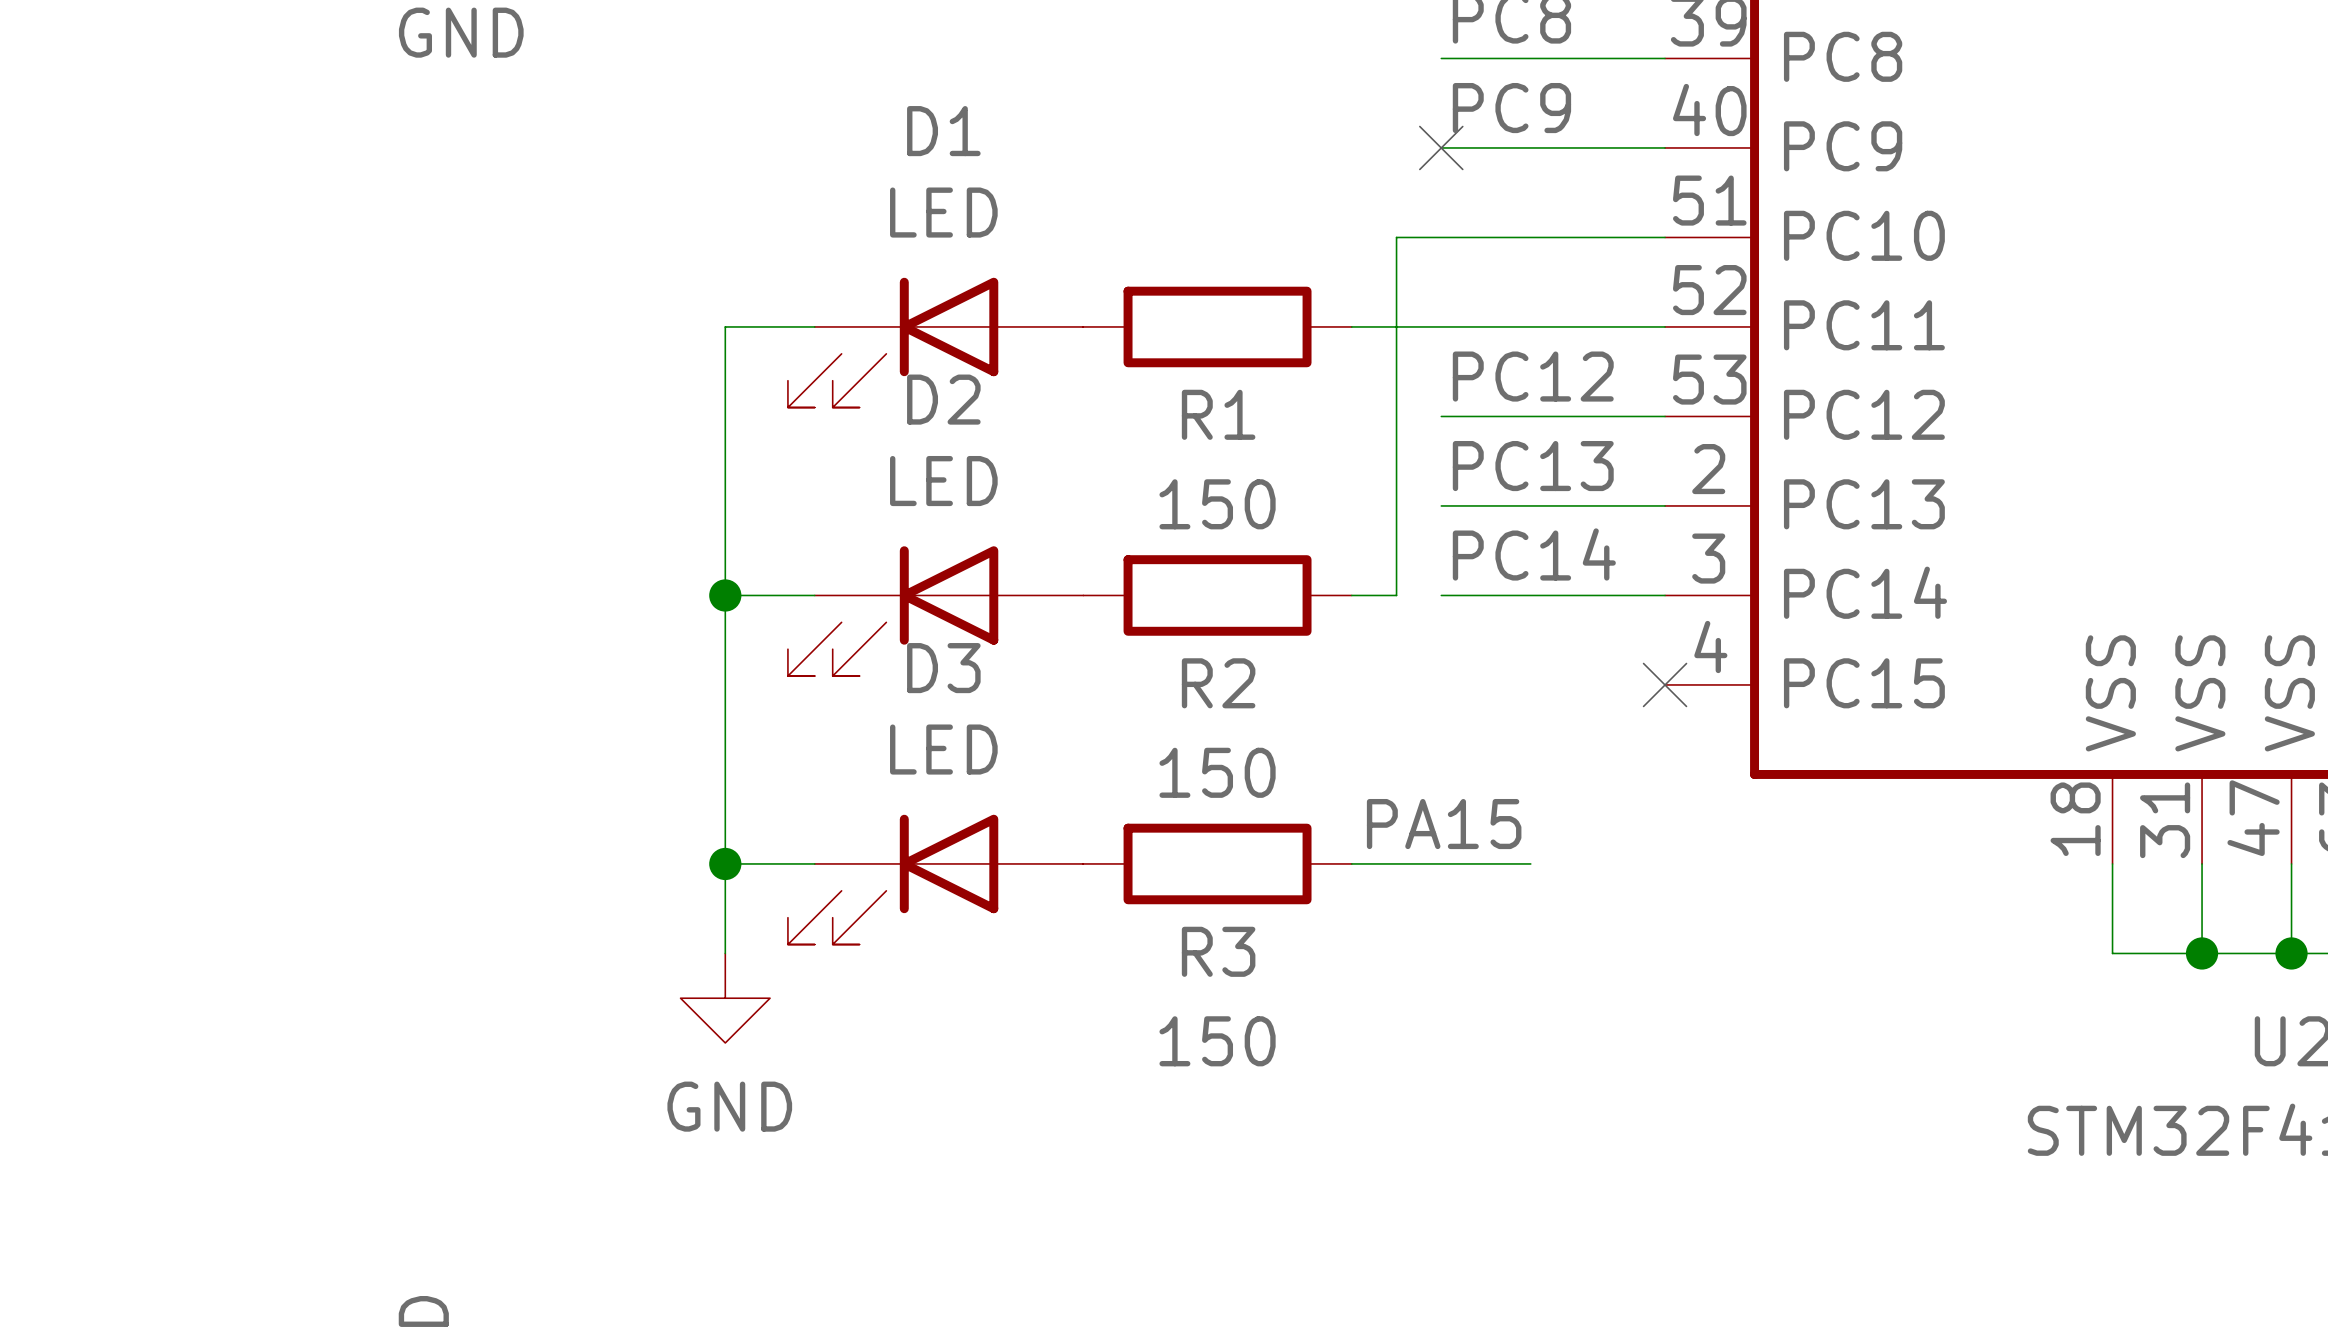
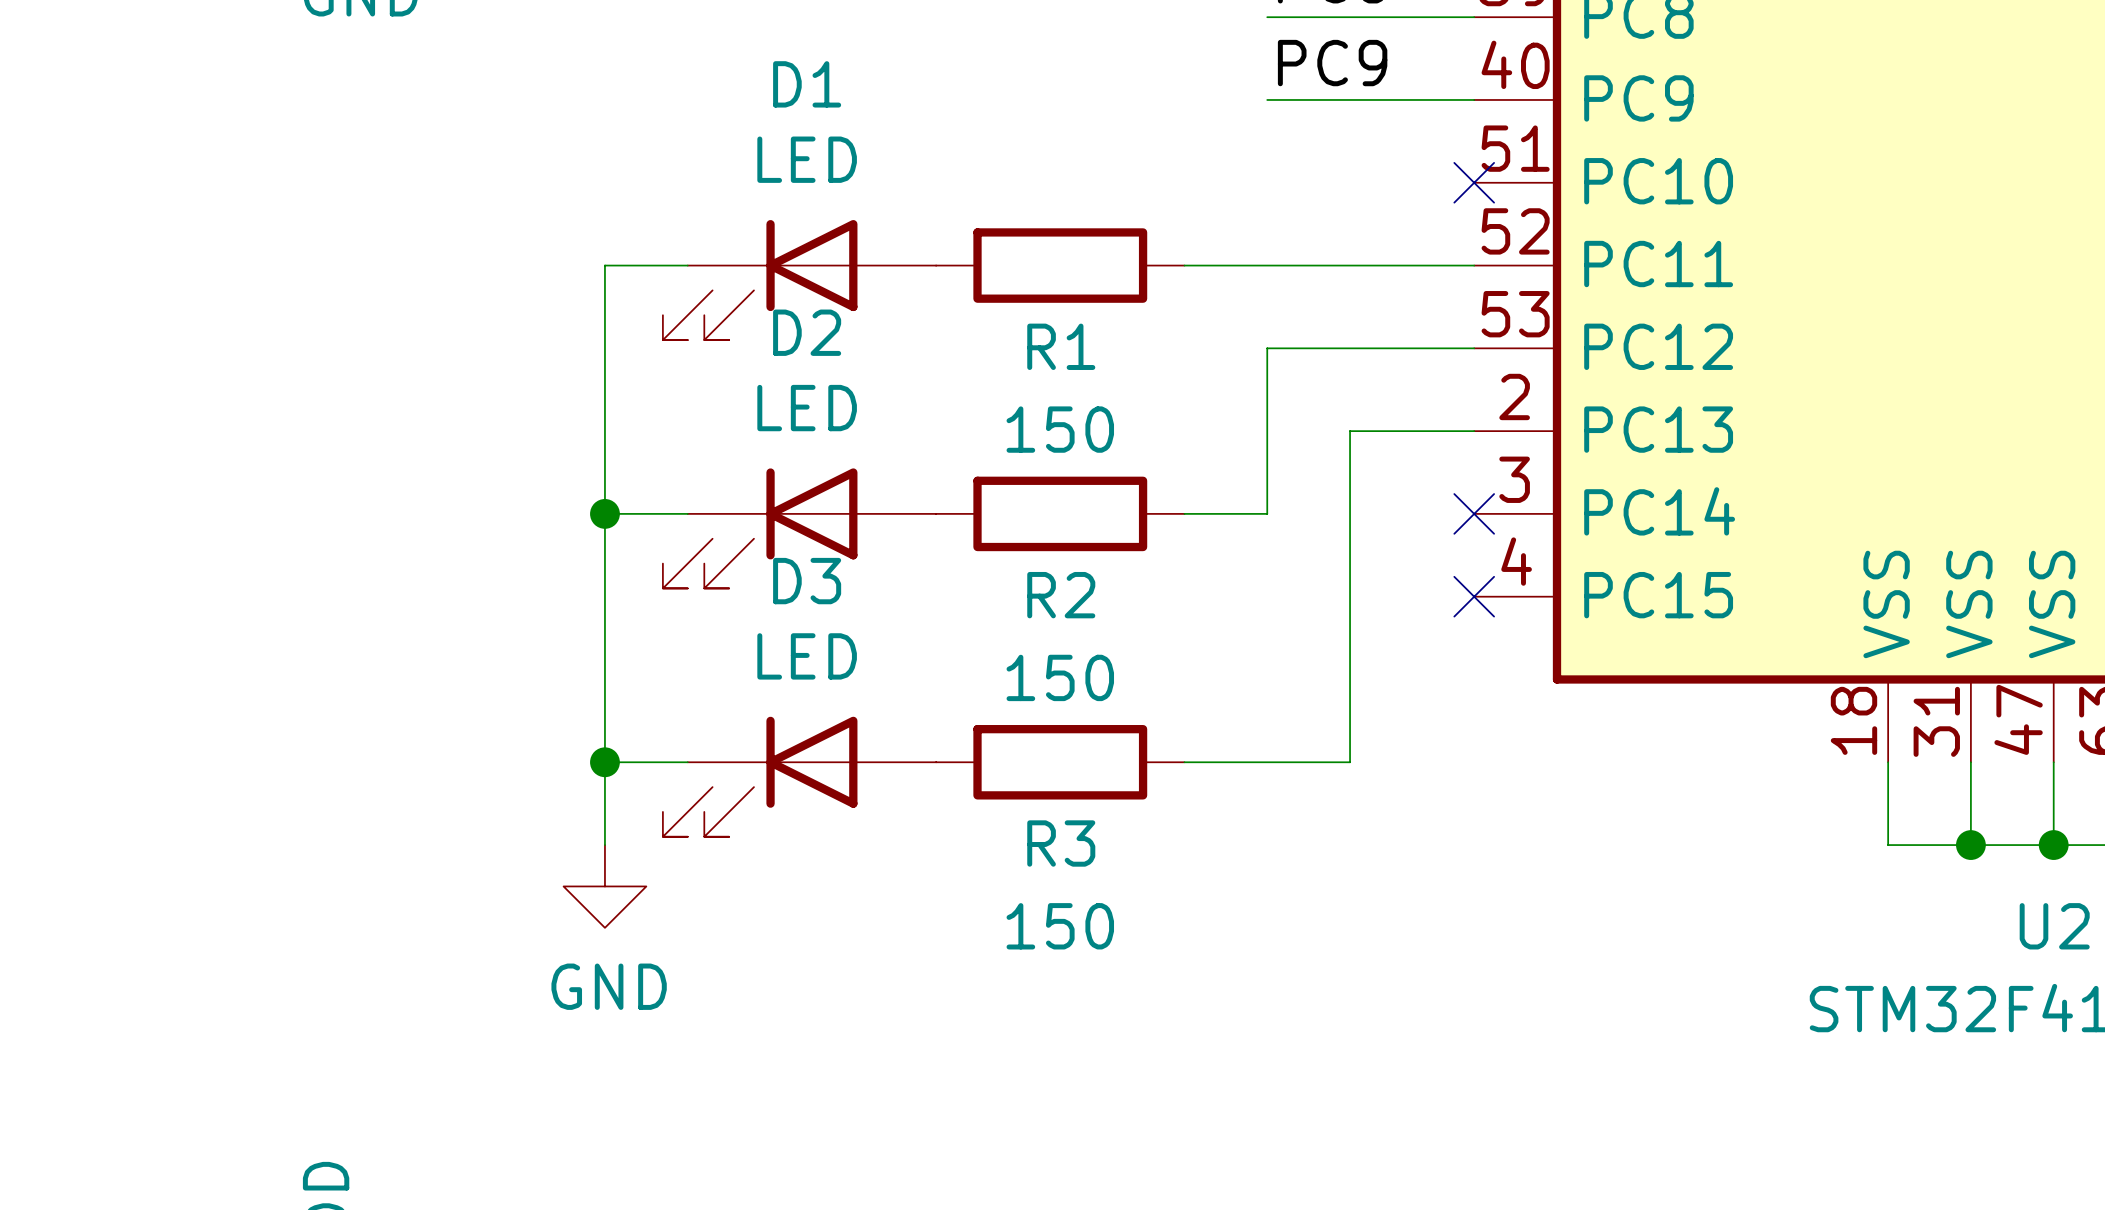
no-connect mark: (1441, 147) -> none
wire: (1665, 237) (1396, 237) (1396, 595) -> (1267, 348) (1267, 513) (1225, 513)
no-connect mark: none -> (1474, 182)
label: PC12 (1533, 376) -> none
label: PC13 (1533, 466) -> none
wire: (1441, 505) (1530, 505) -> (1350, 762) (1350, 431)
label: PC14 (1534, 554) -> none
wire: (1441, 595) (1665, 595) -> none
no-connect mark: none -> (1474, 513)
label: PA15 (1444, 824) -> none

